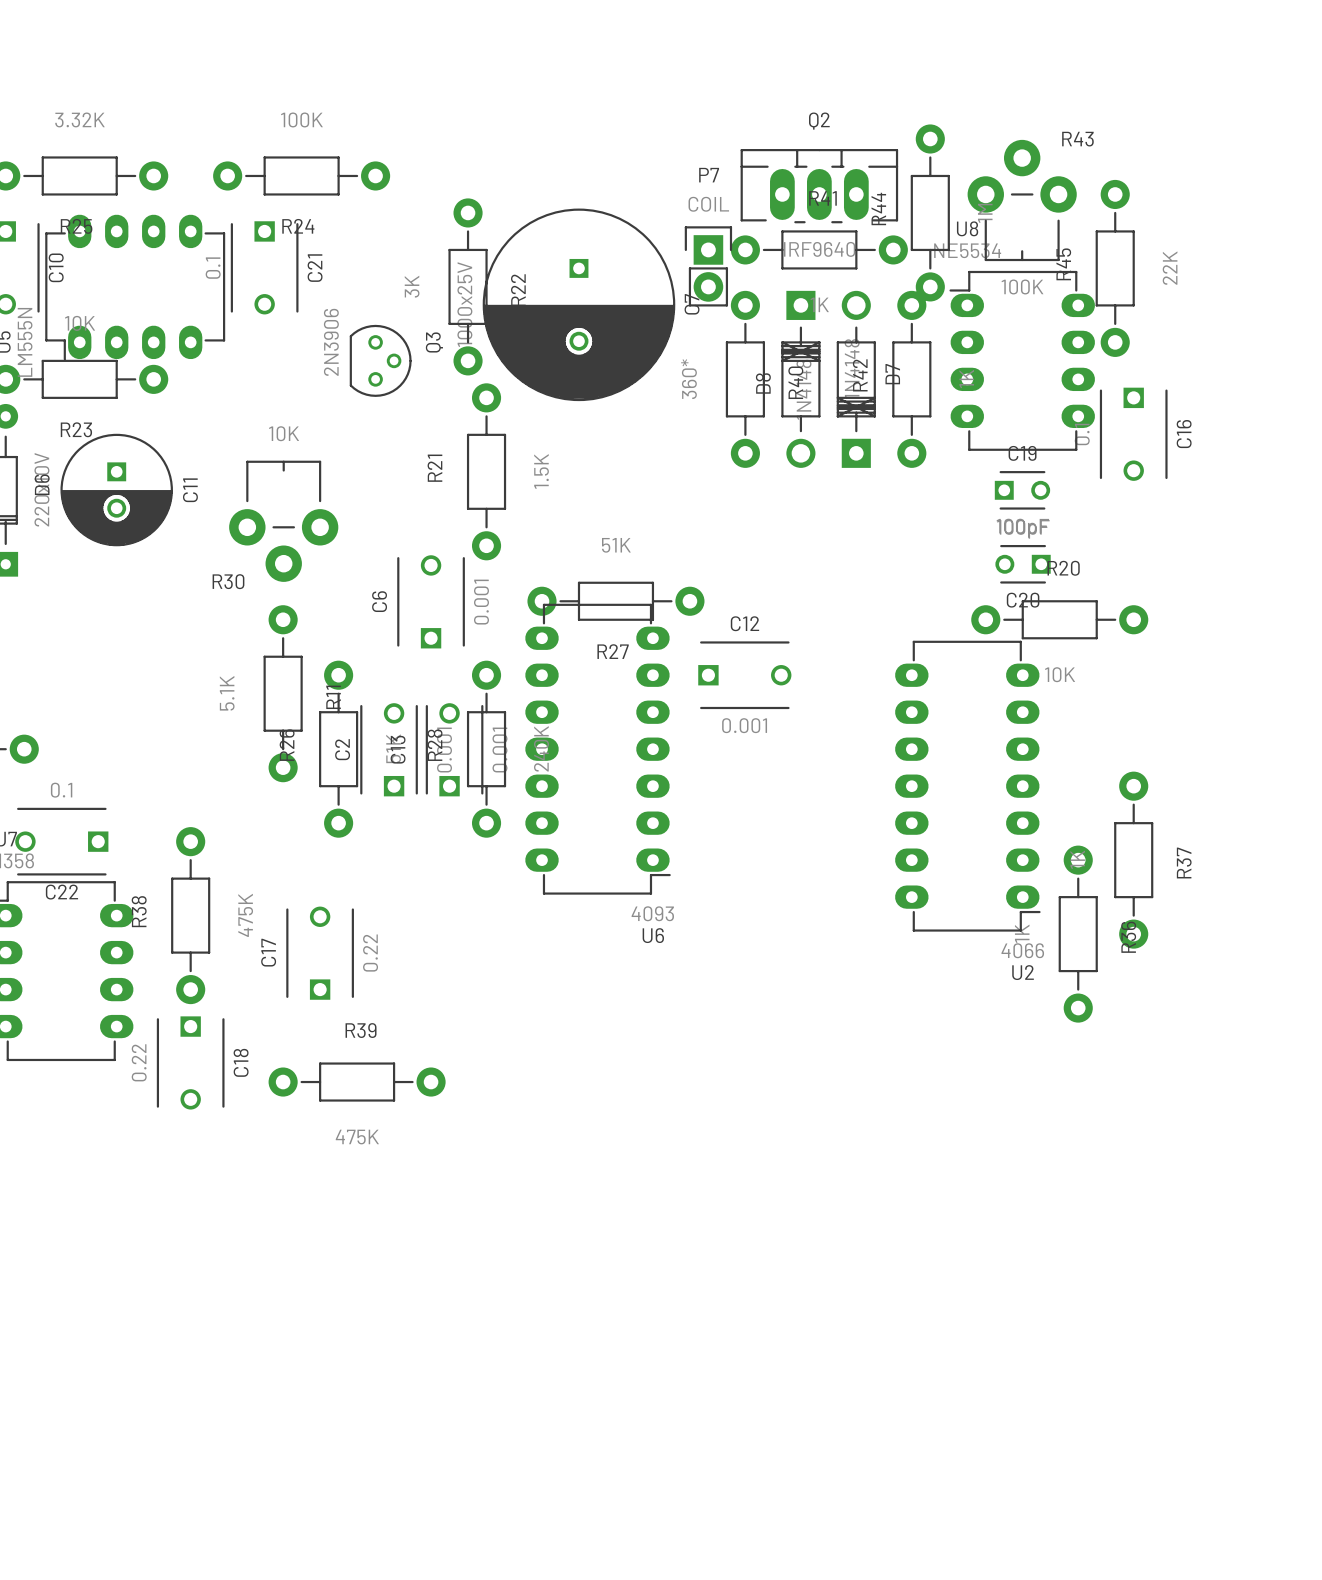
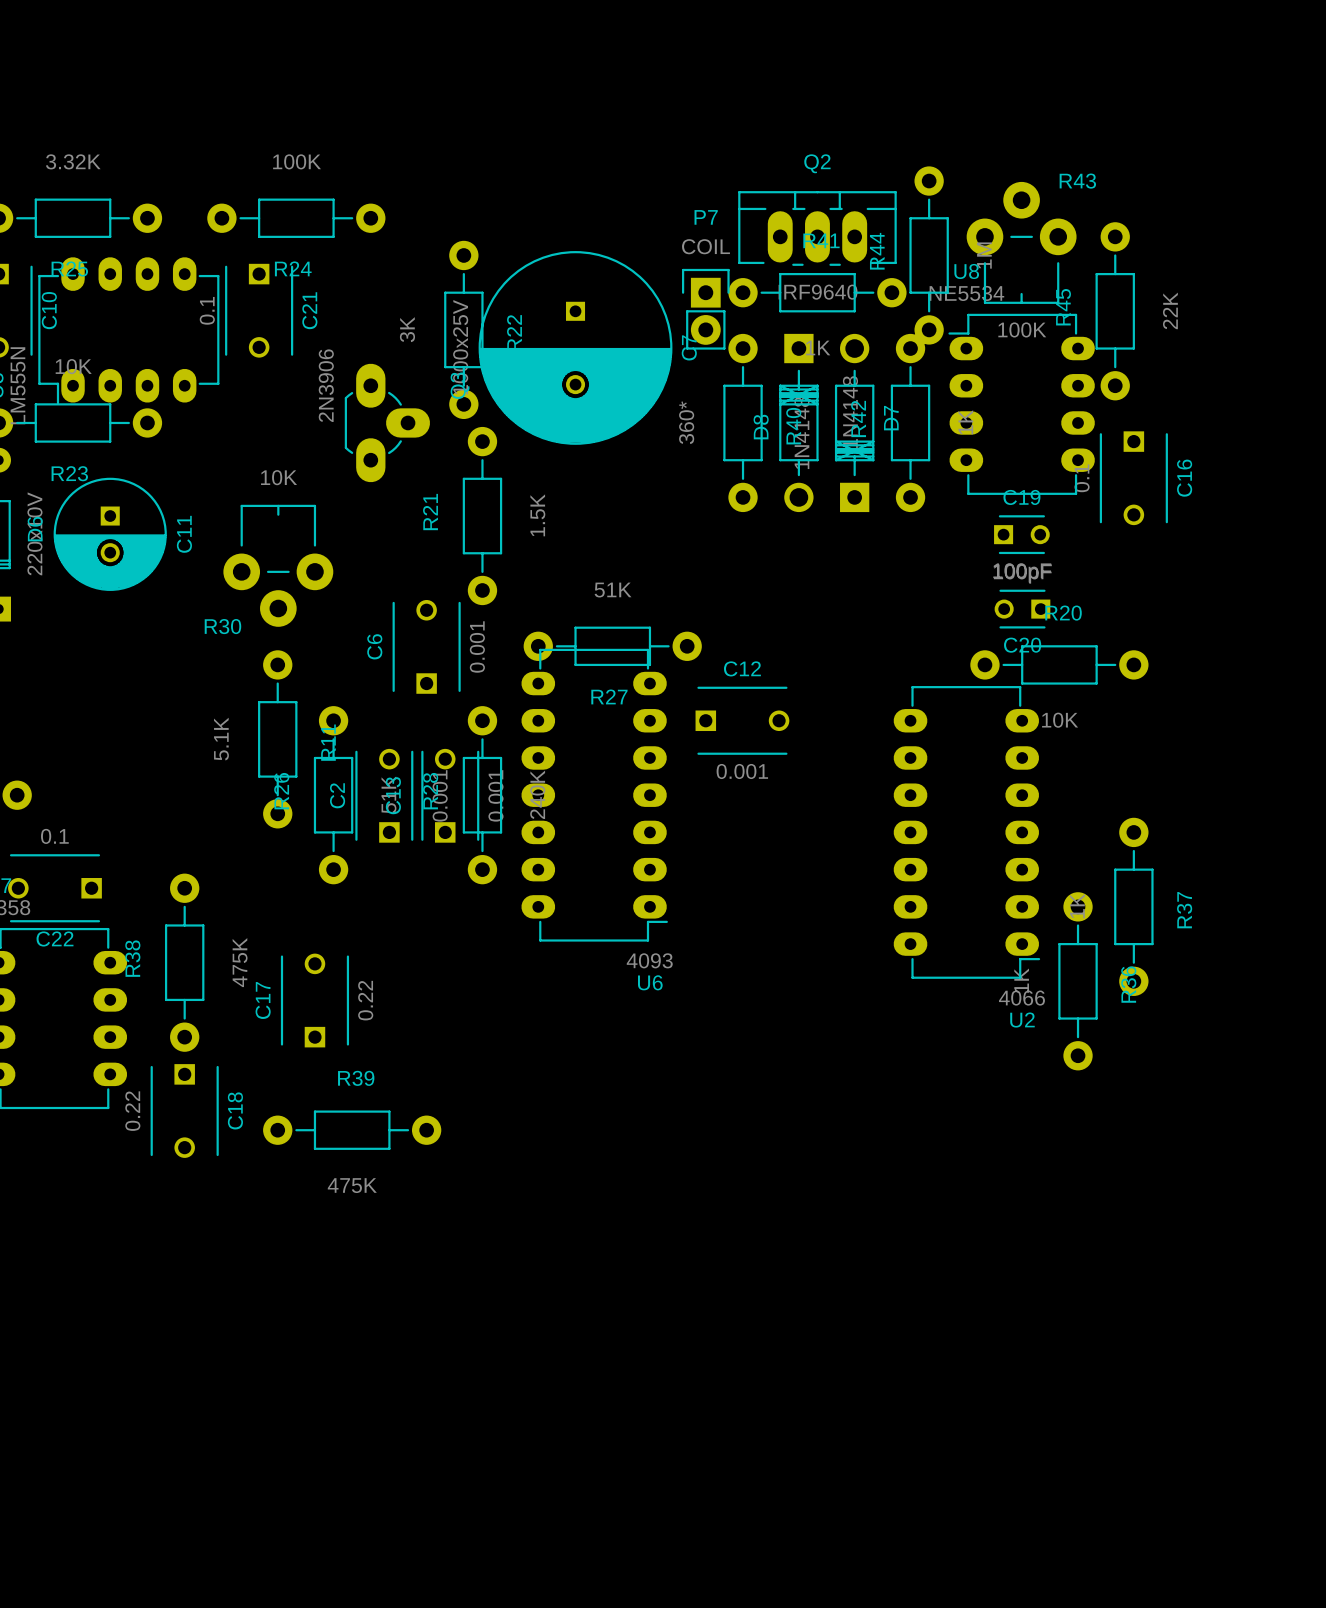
Q3 footprint: [349, 324, 412, 397] -> [344, 363, 431, 483]

